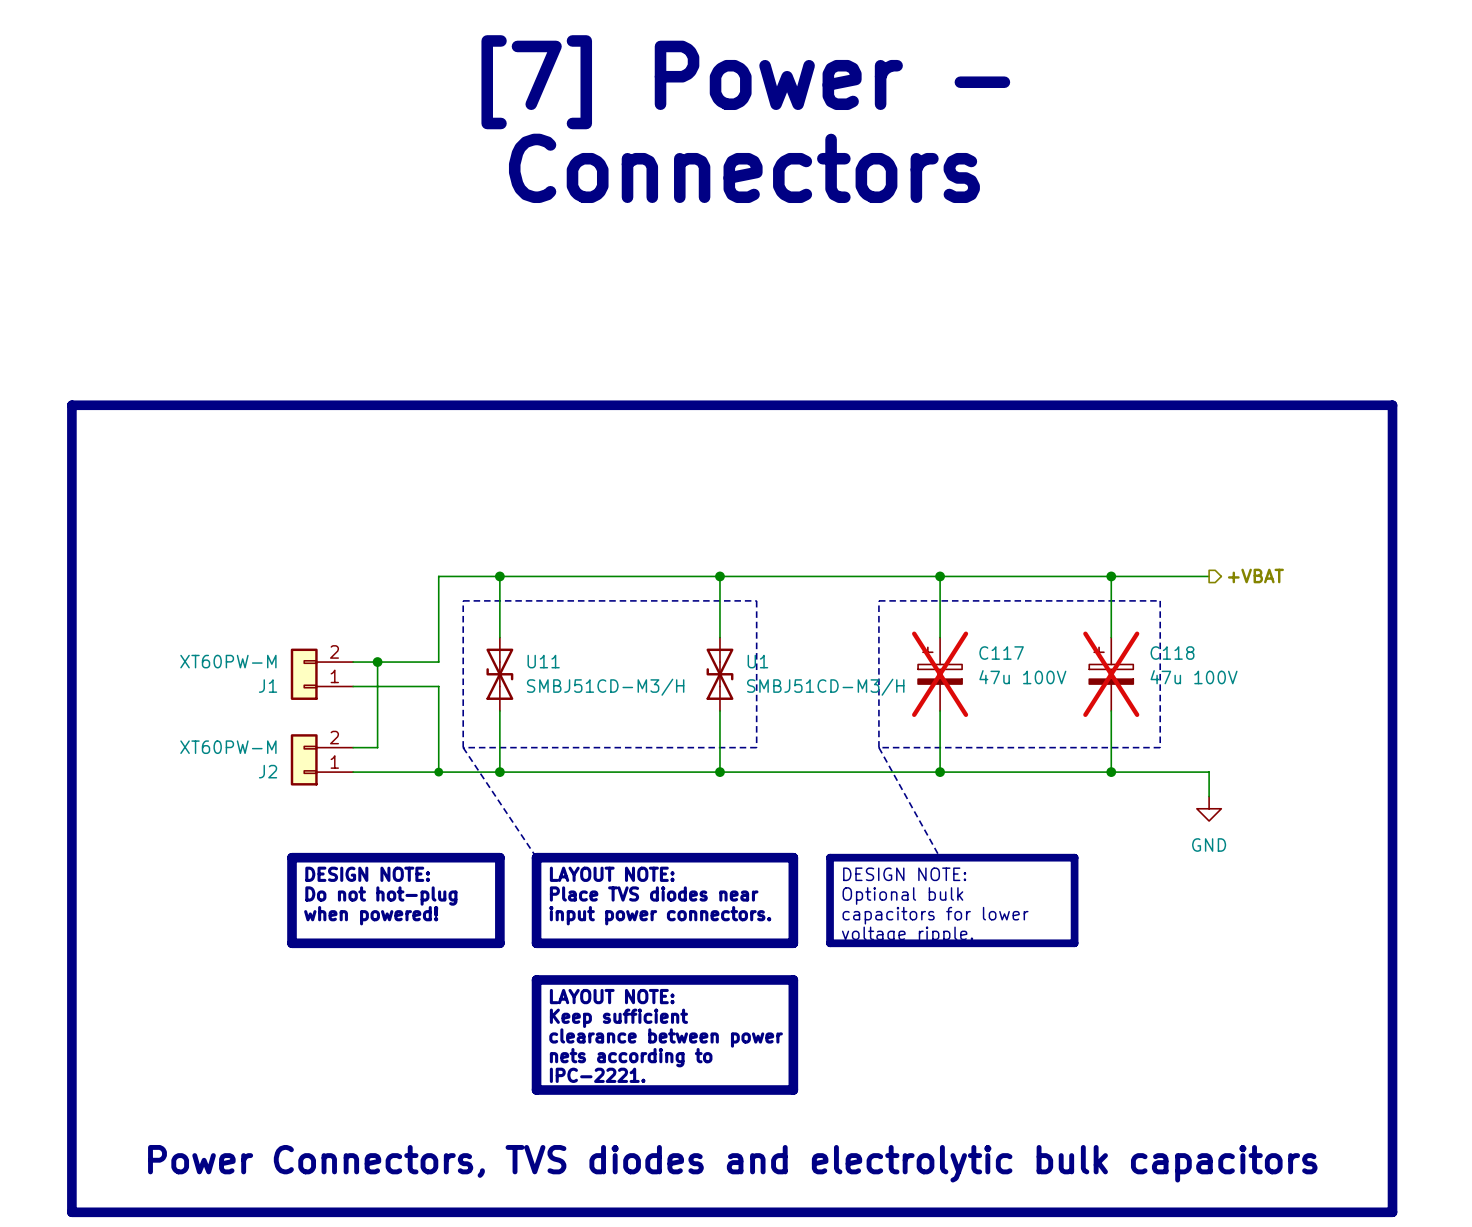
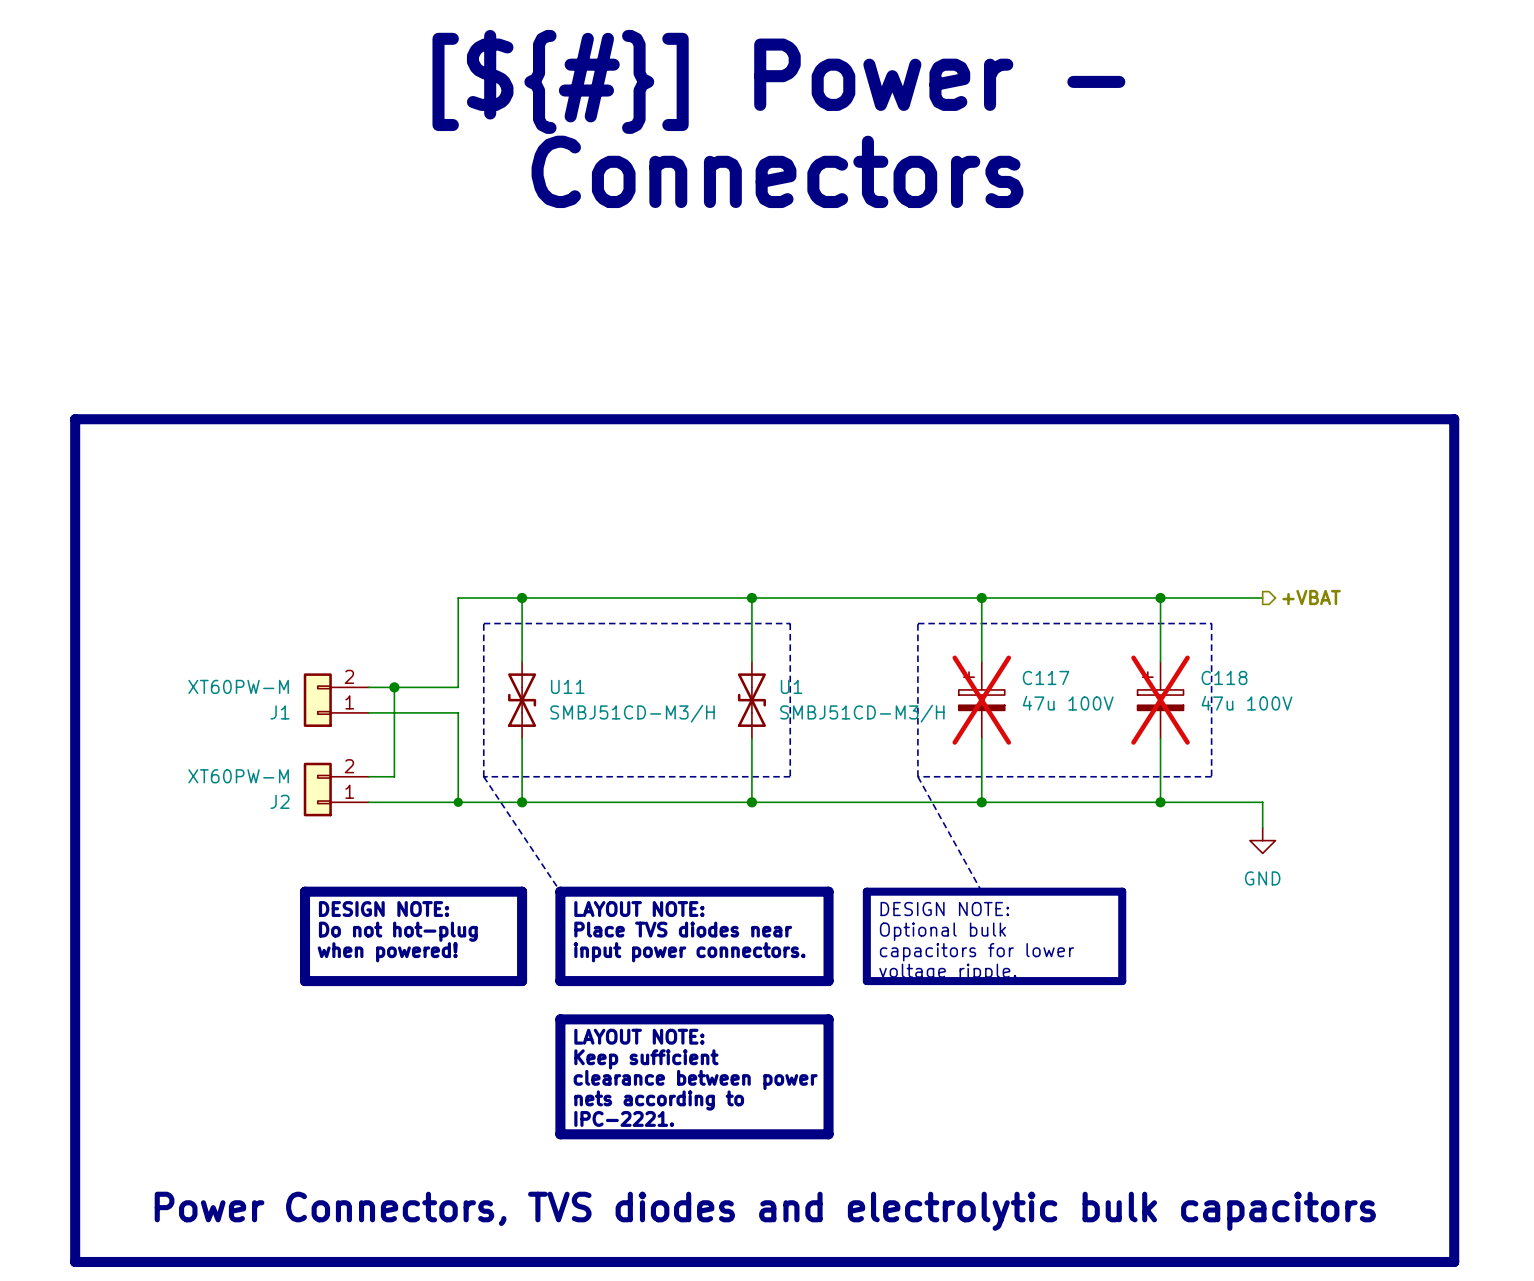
text: [7] Power - (745, 82) -> [${#}] Power - (778, 81)

